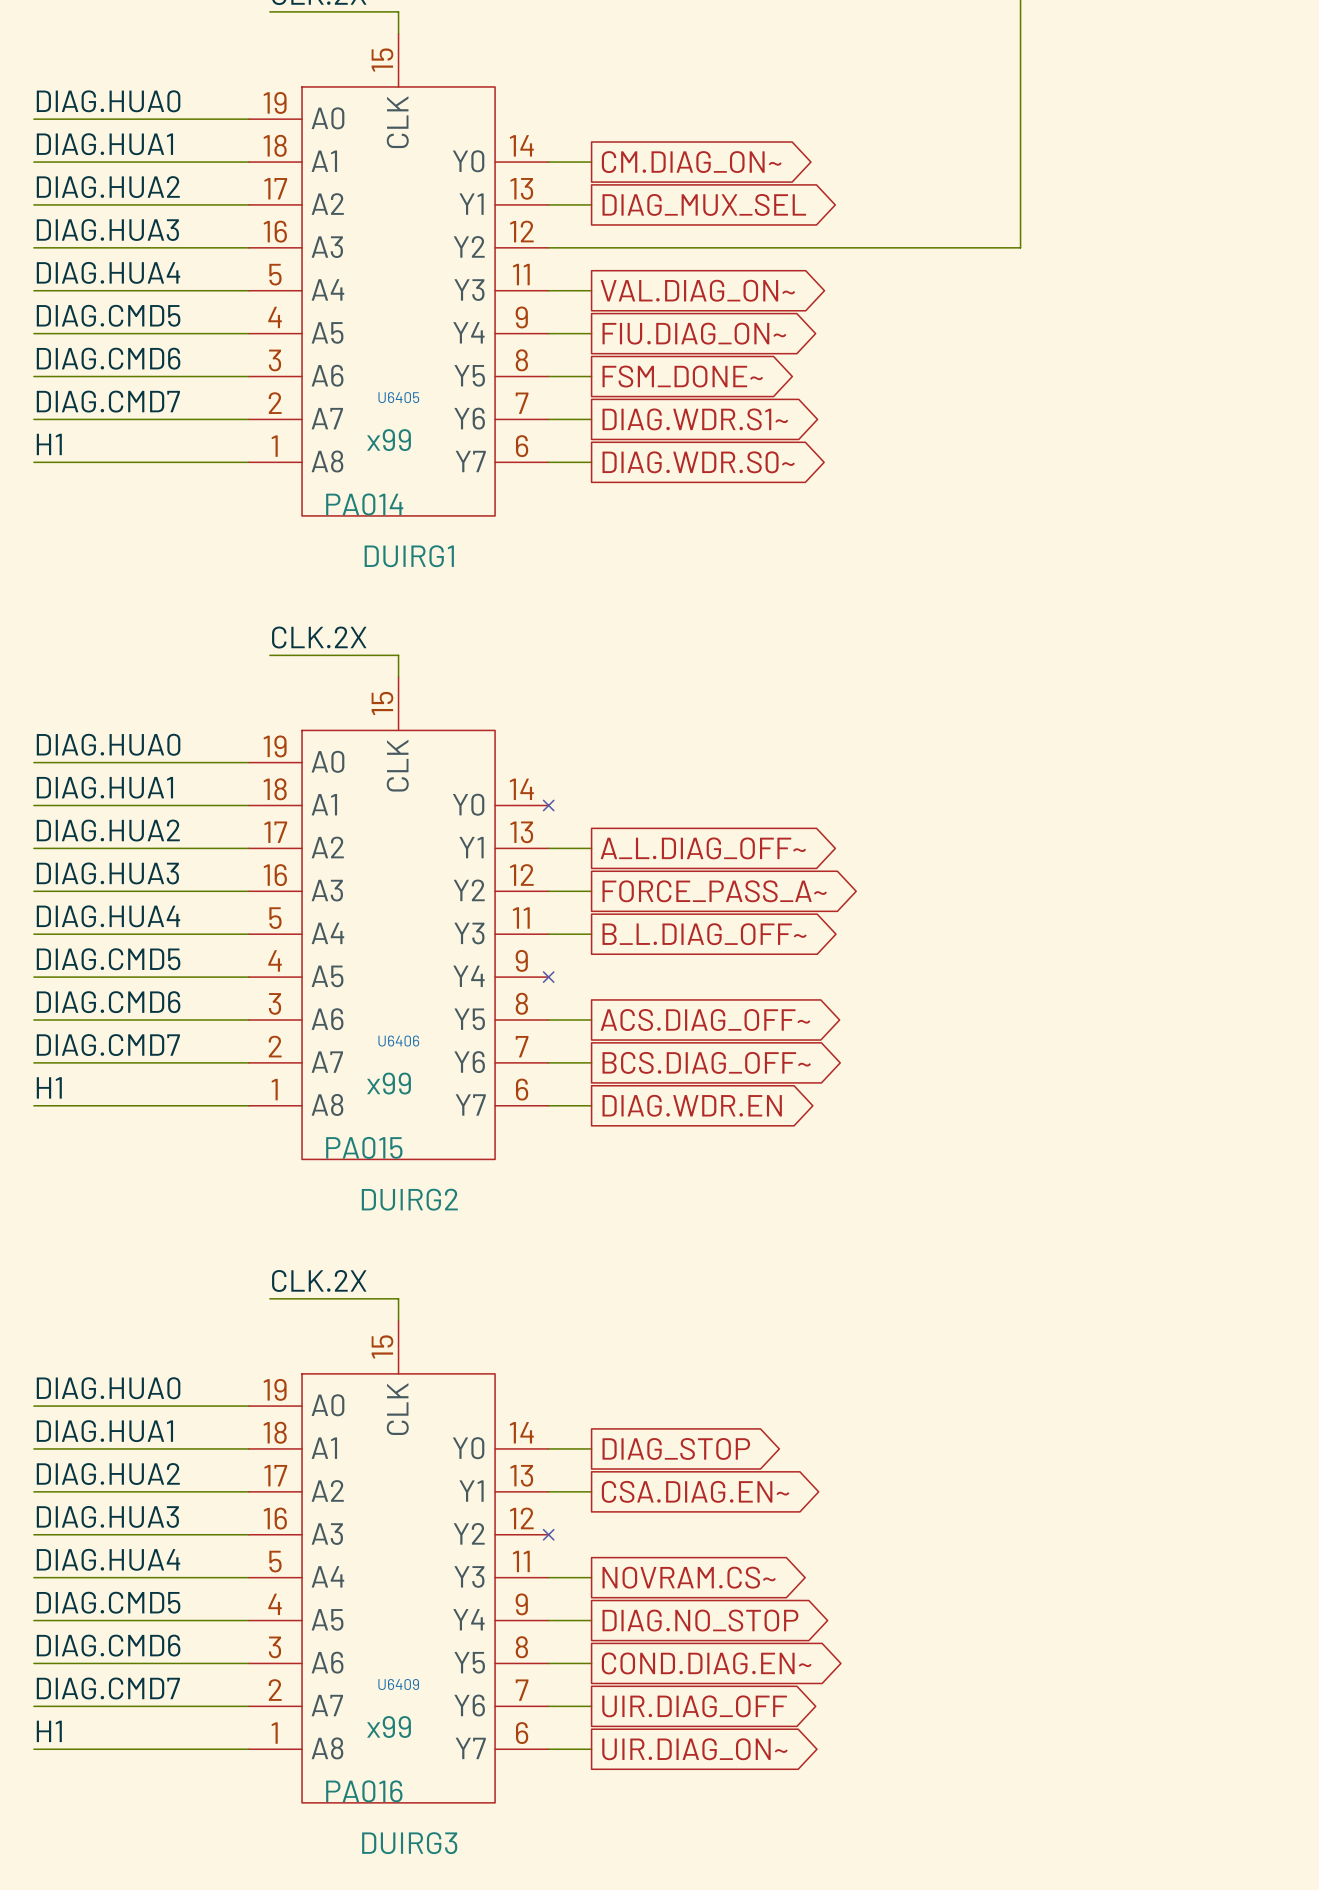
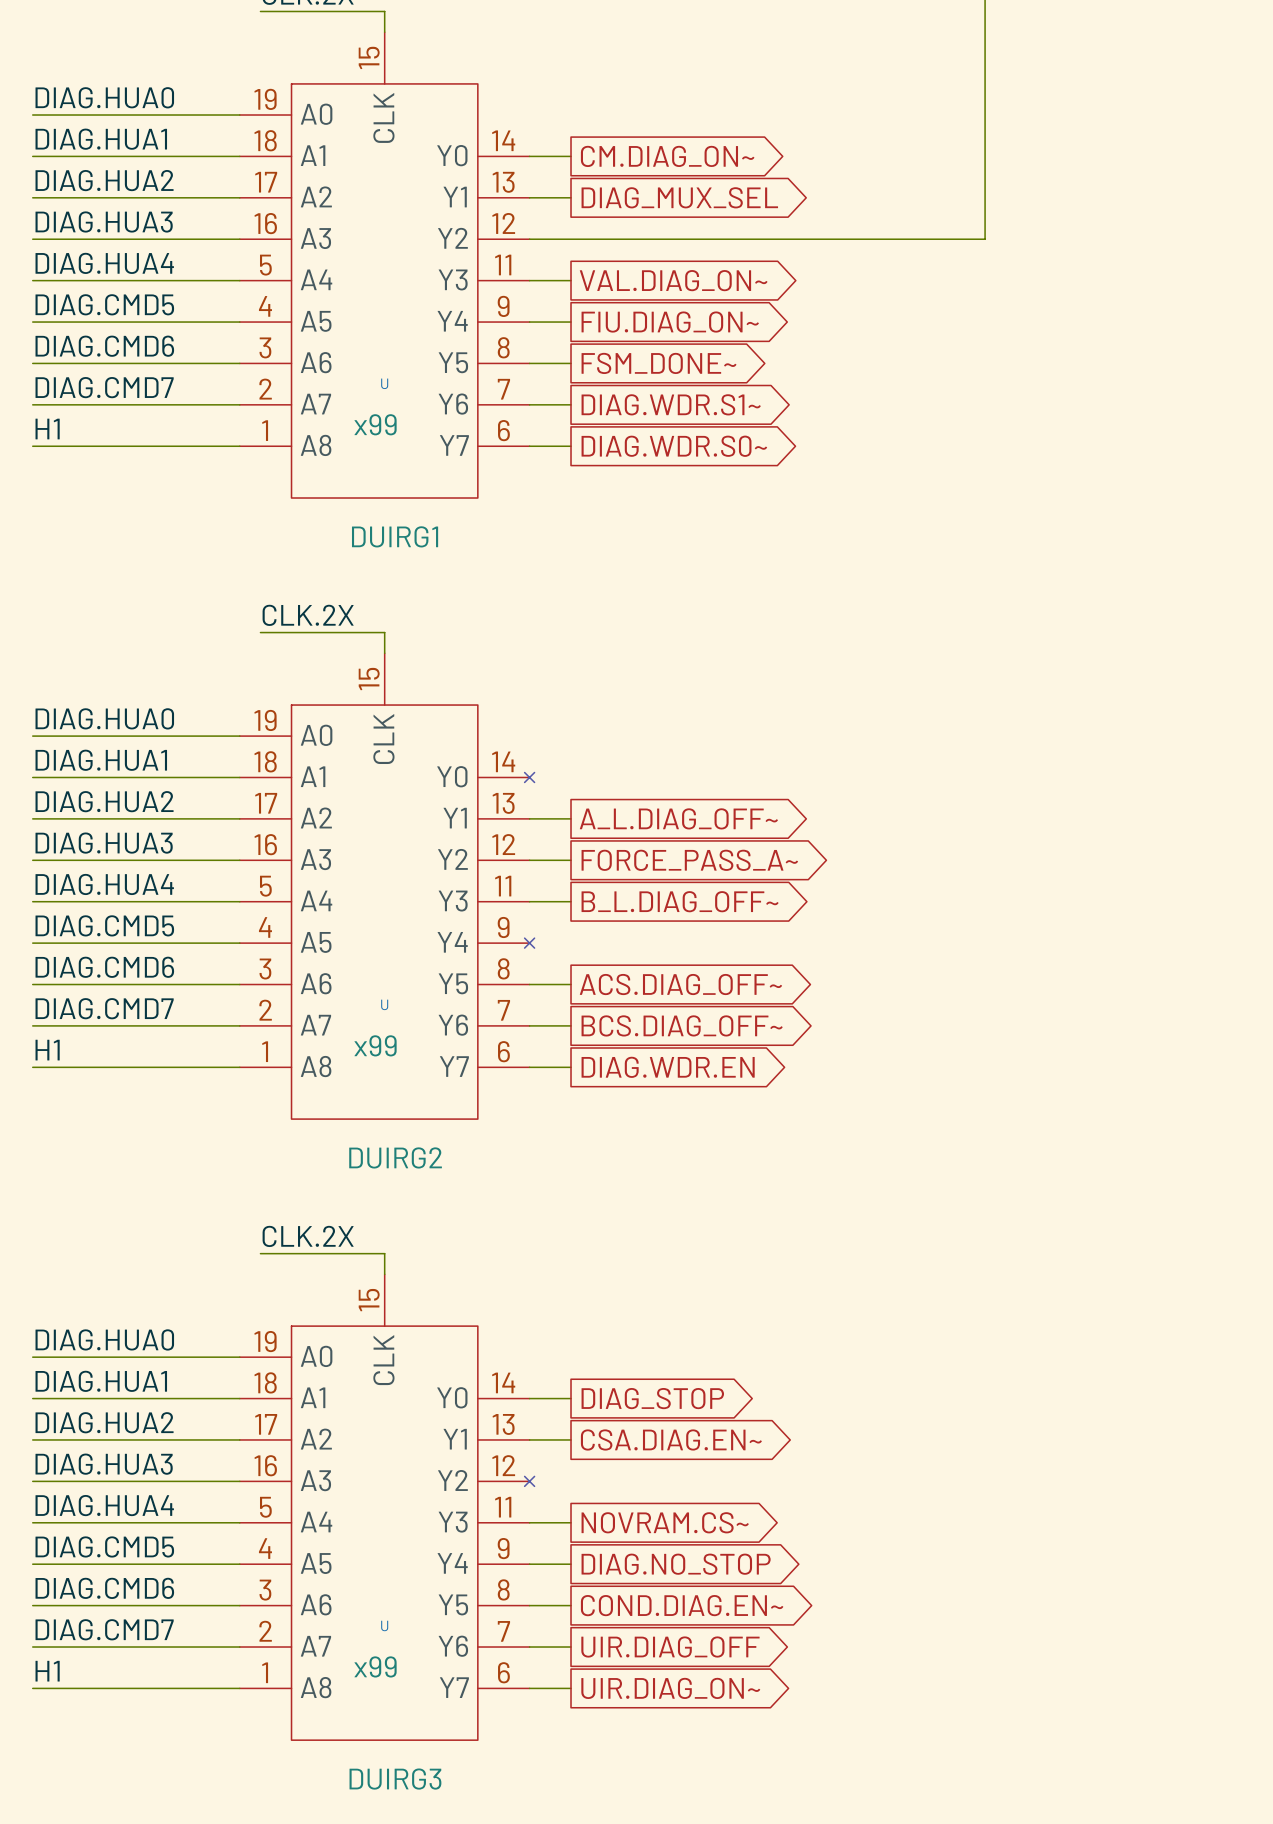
U6405 name: U6405 (398, 397) -> U (384, 383)
U6405 value: PA014 (364, 504) -> none
U6406 name: U6406 (398, 1041) -> U (384, 1004)
U6406 value: PA015 (364, 1147) -> none
U6409 name: U6409 (398, 1684) -> U (384, 1625)
U6409 value: PA016 (364, 1791) -> none

